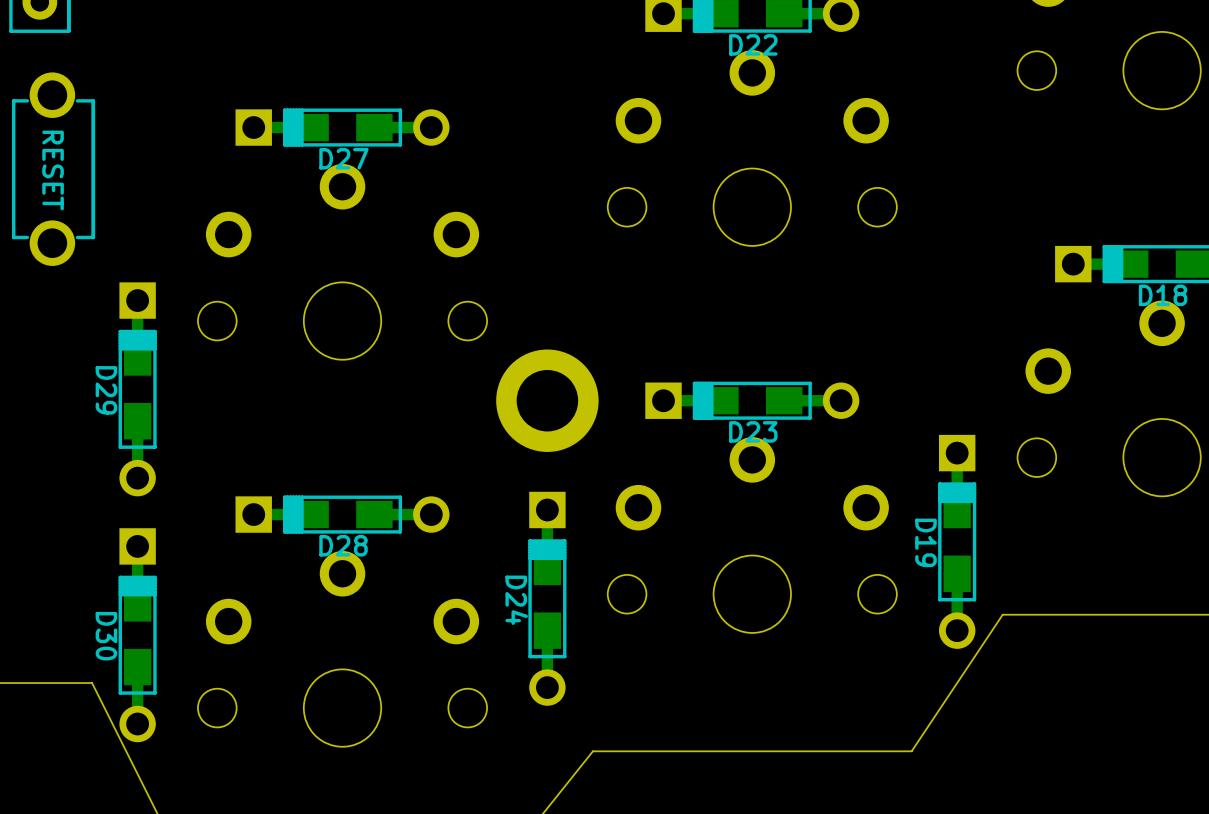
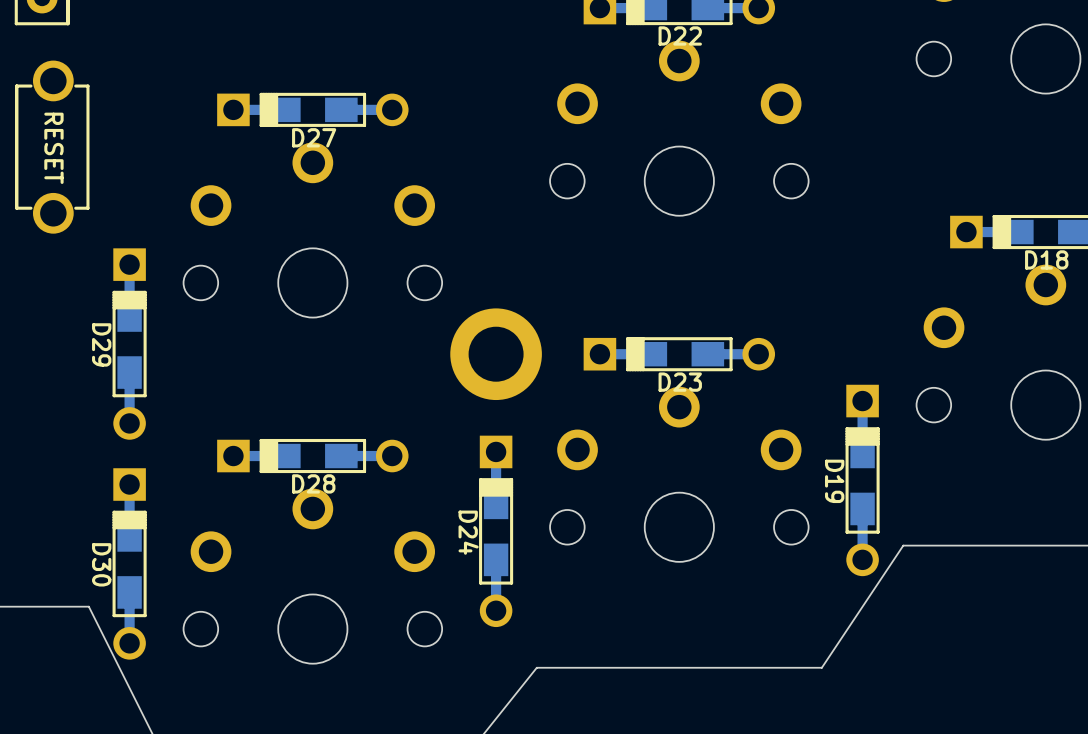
part rotation: 0° (53, 169) -> 180° (52, 147)

